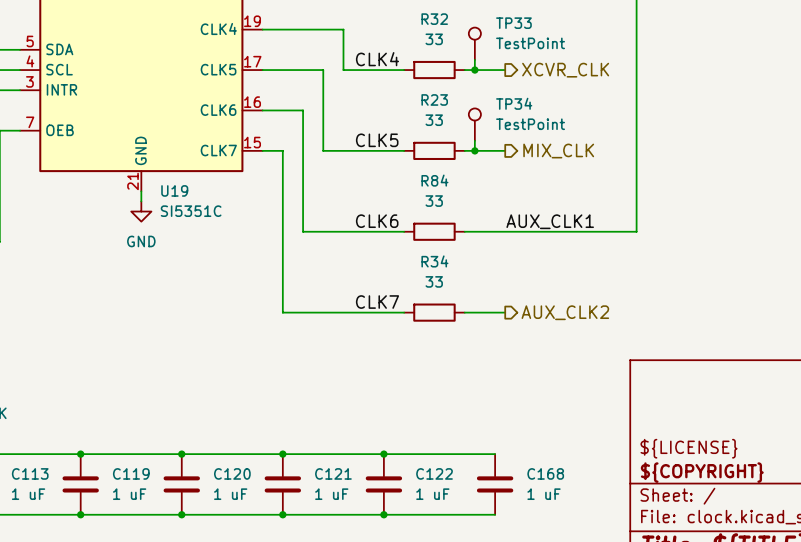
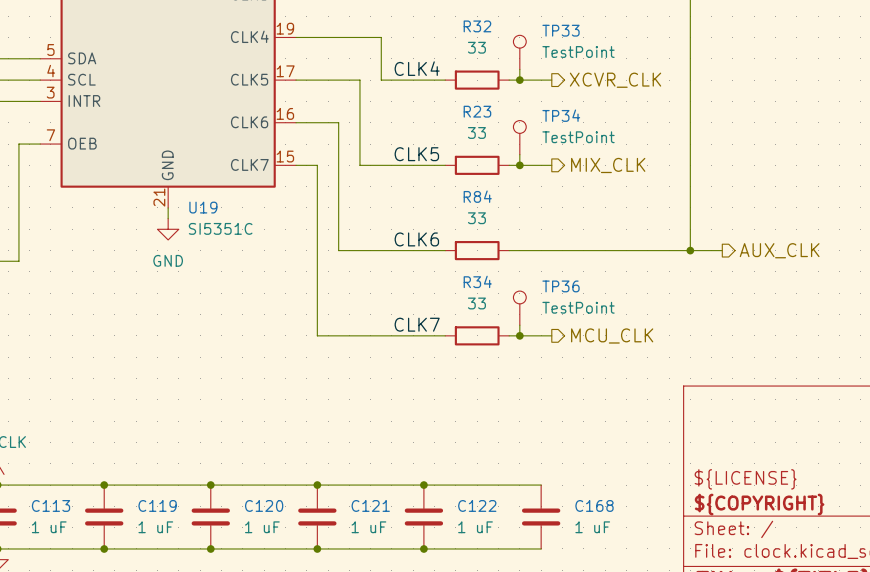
label: AUX_CLK1 (550, 221) -> none
wire: none -> (690, 250) (722, 250)
junction: none -> (690, 250)
hierarchical label: none -> AUX_CLK (779, 250)
TP36: none -> TestPoint (519, 308)
wire: none -> (519, 325) (519, 335)
junction: none -> (519, 335)
hierarchical label: AUX_CLK2 (565, 312) -> MCU_CLK (612, 335)

